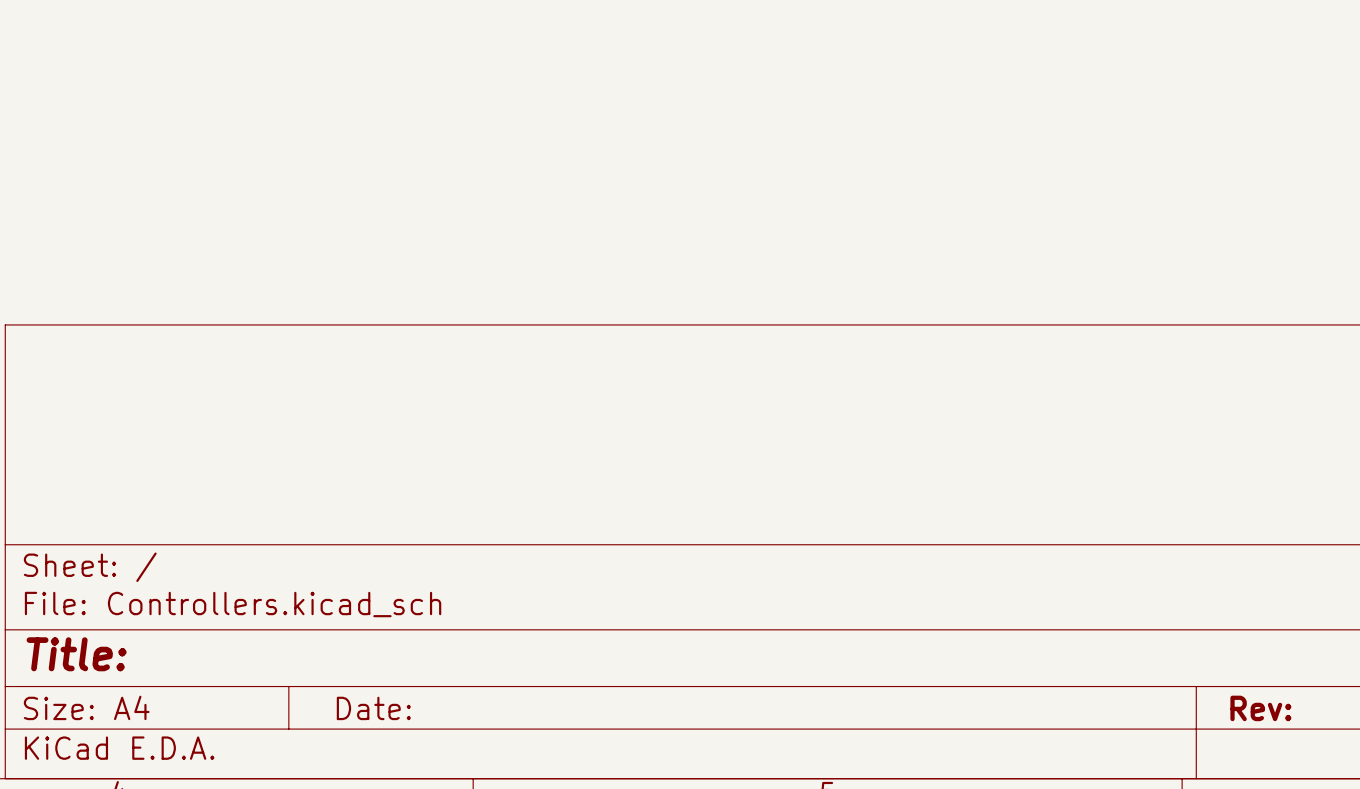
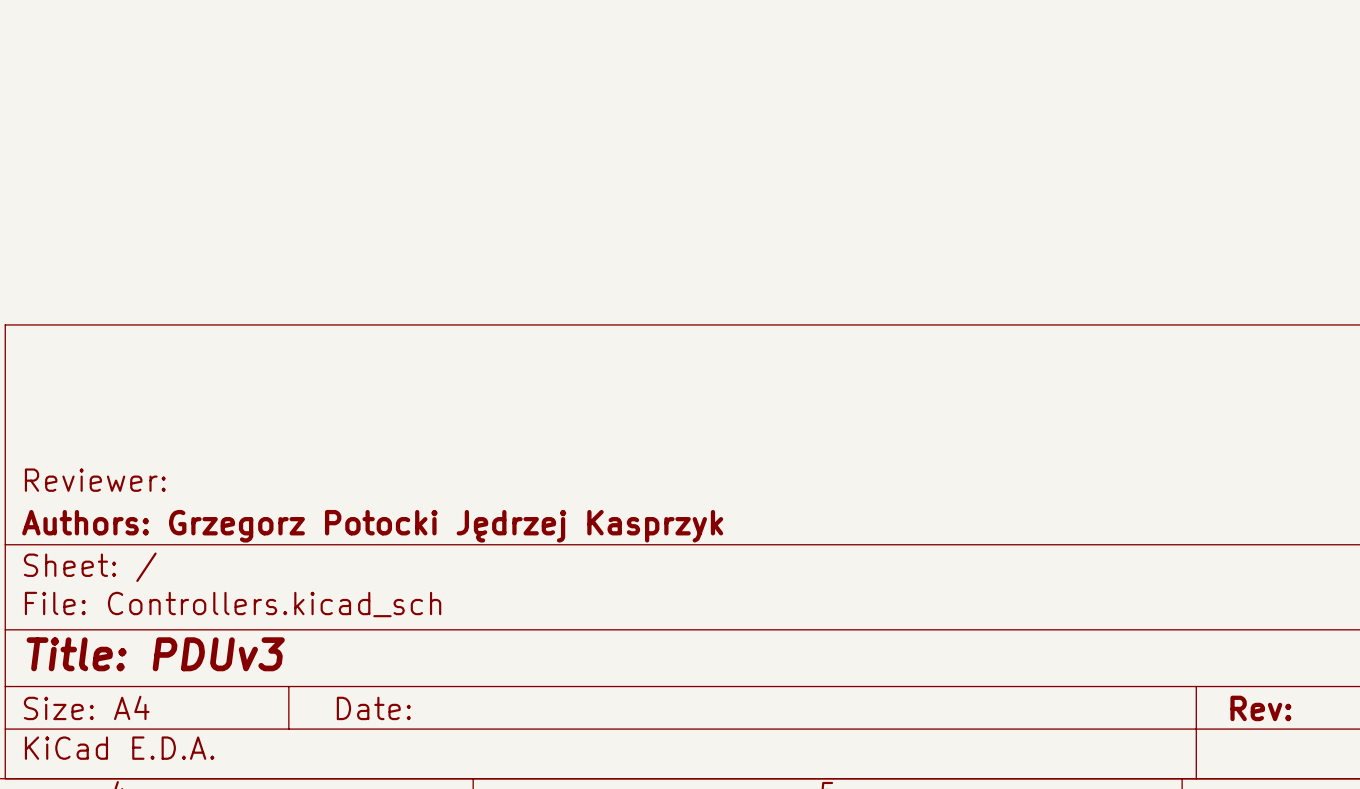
title block: none -> Reviewer: (95, 480)
title block: none -> Authors: Grzegorz Potocki Jędrzej Kasprzyk (372, 526)
title block: Title: (76, 654) -> Title: PDUv3 (155, 654)

